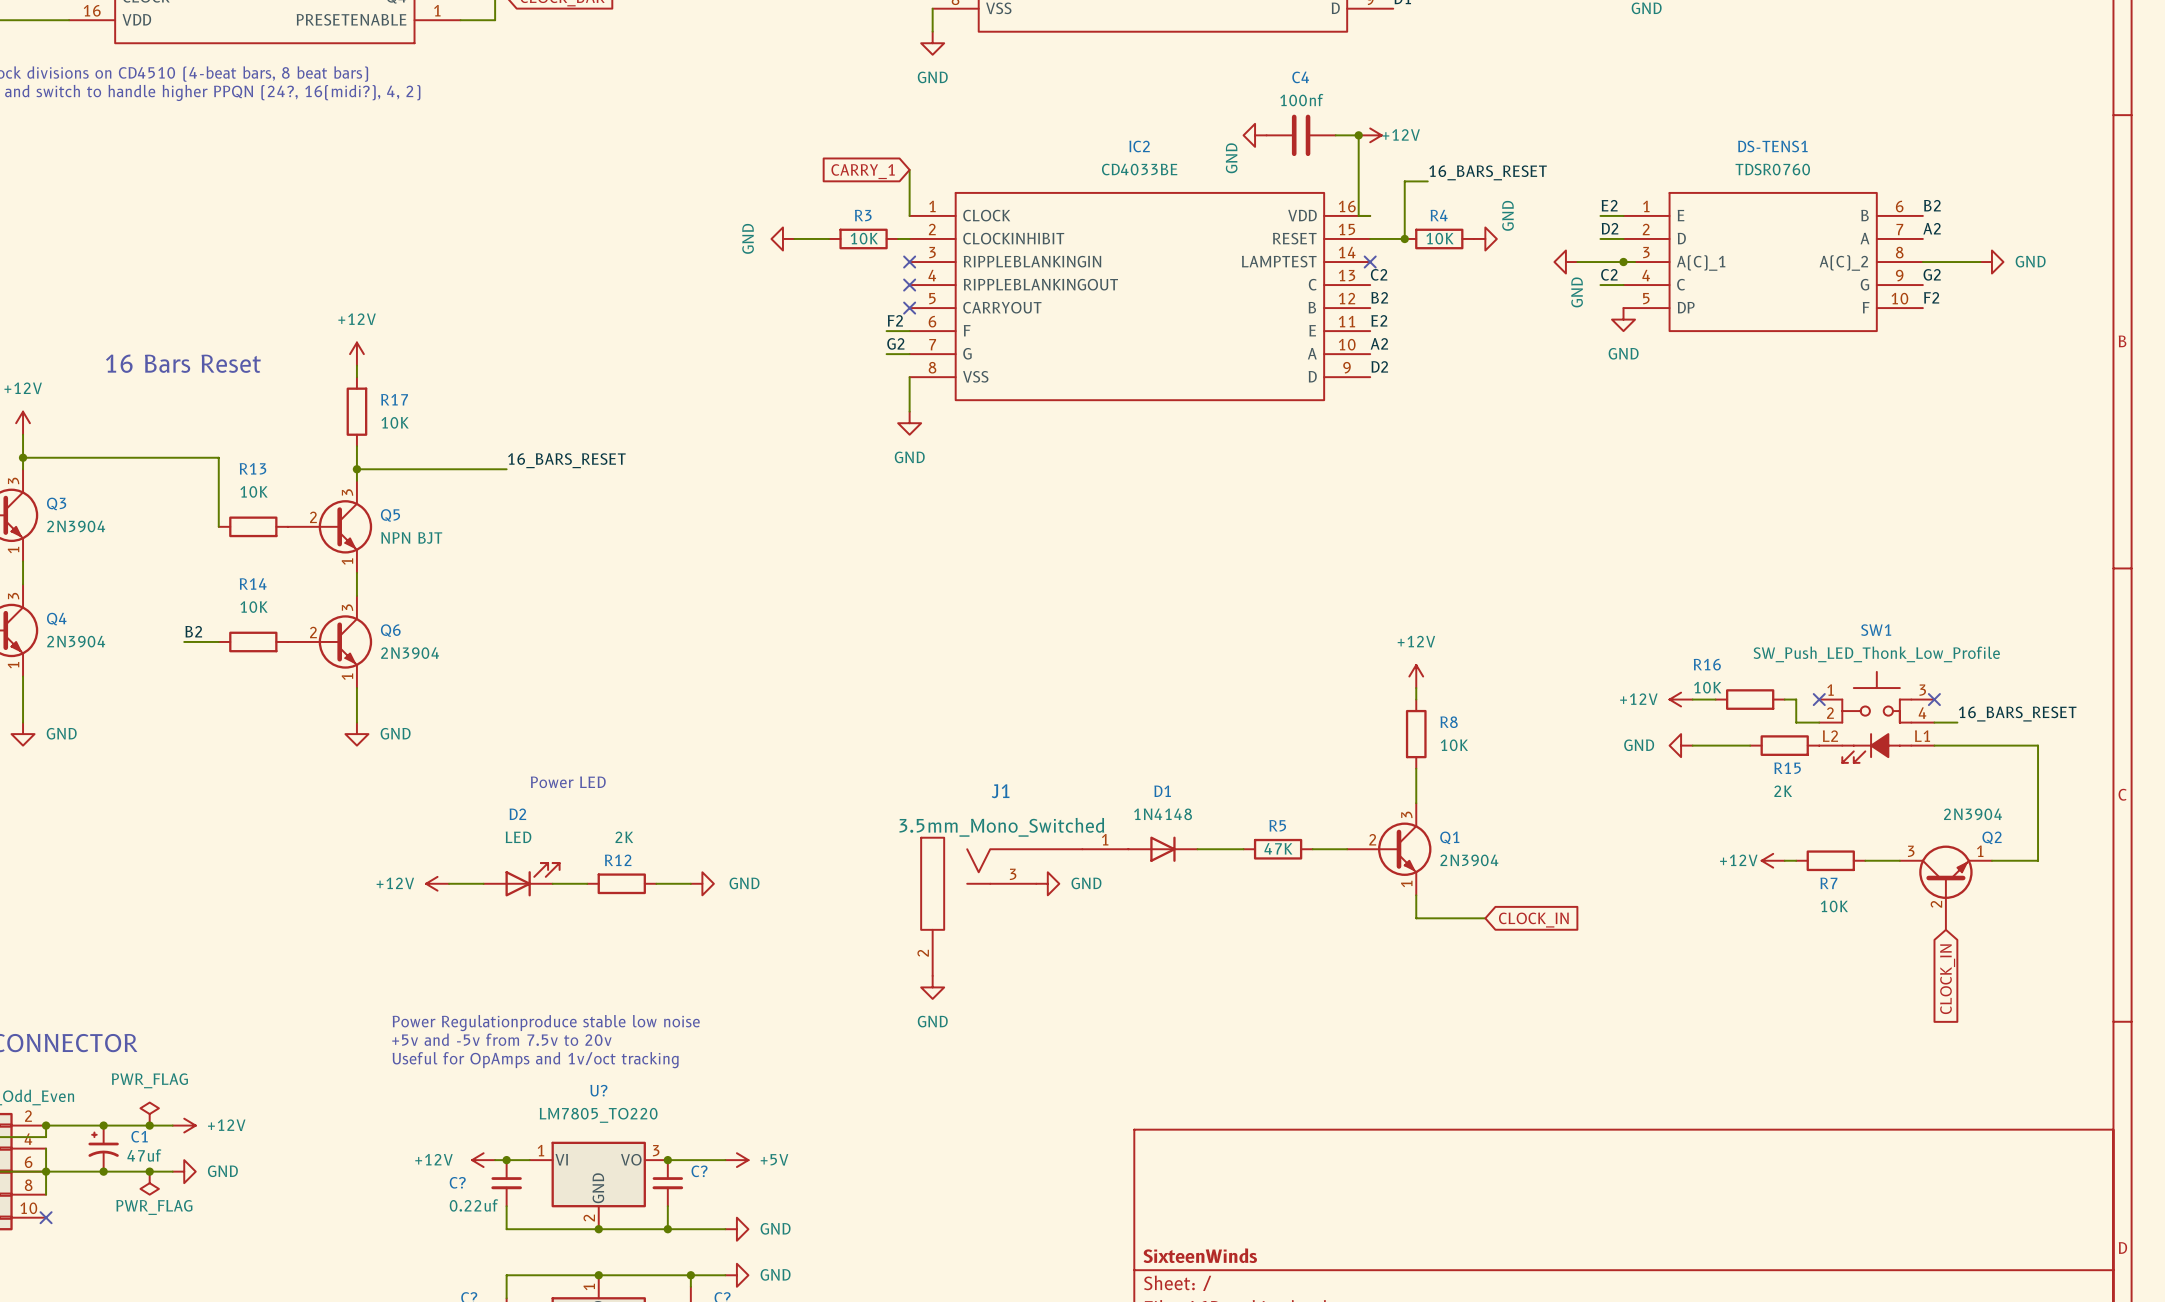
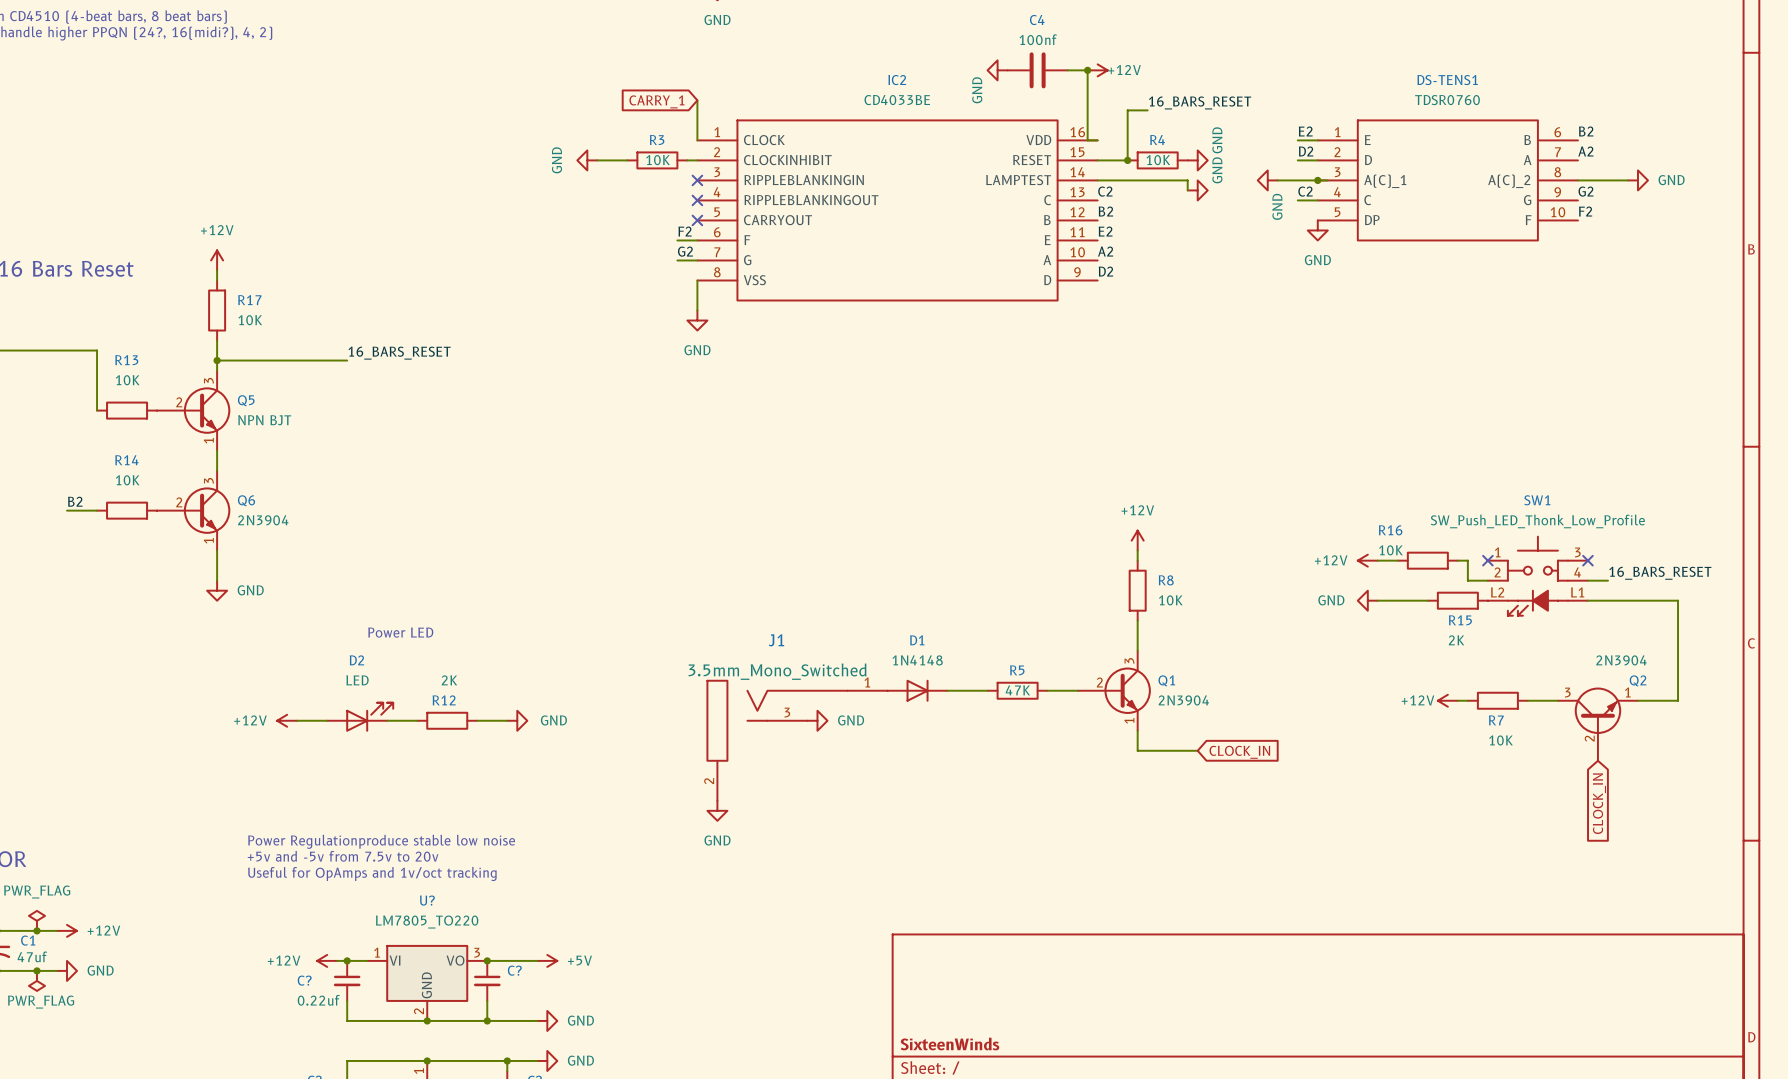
wire: none -> (1097, 180) (1187, 180) (1187, 190)
no-connect mark: (1370, 262) -> none
power symbol: none -> GND (1197, 190)

